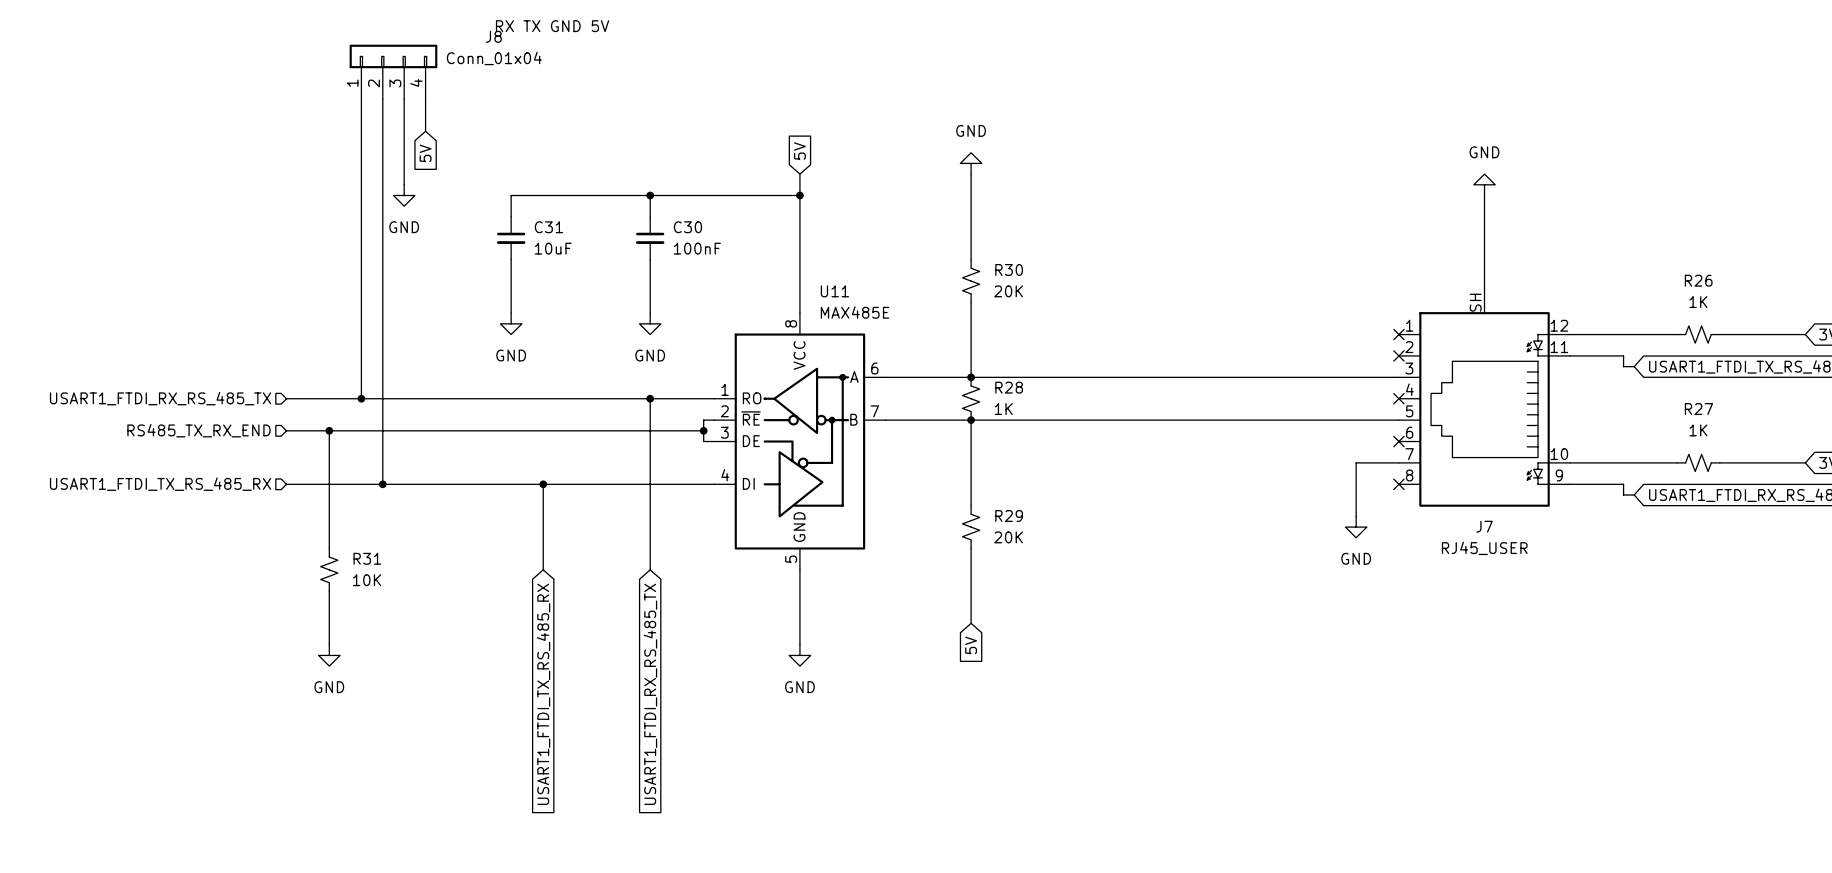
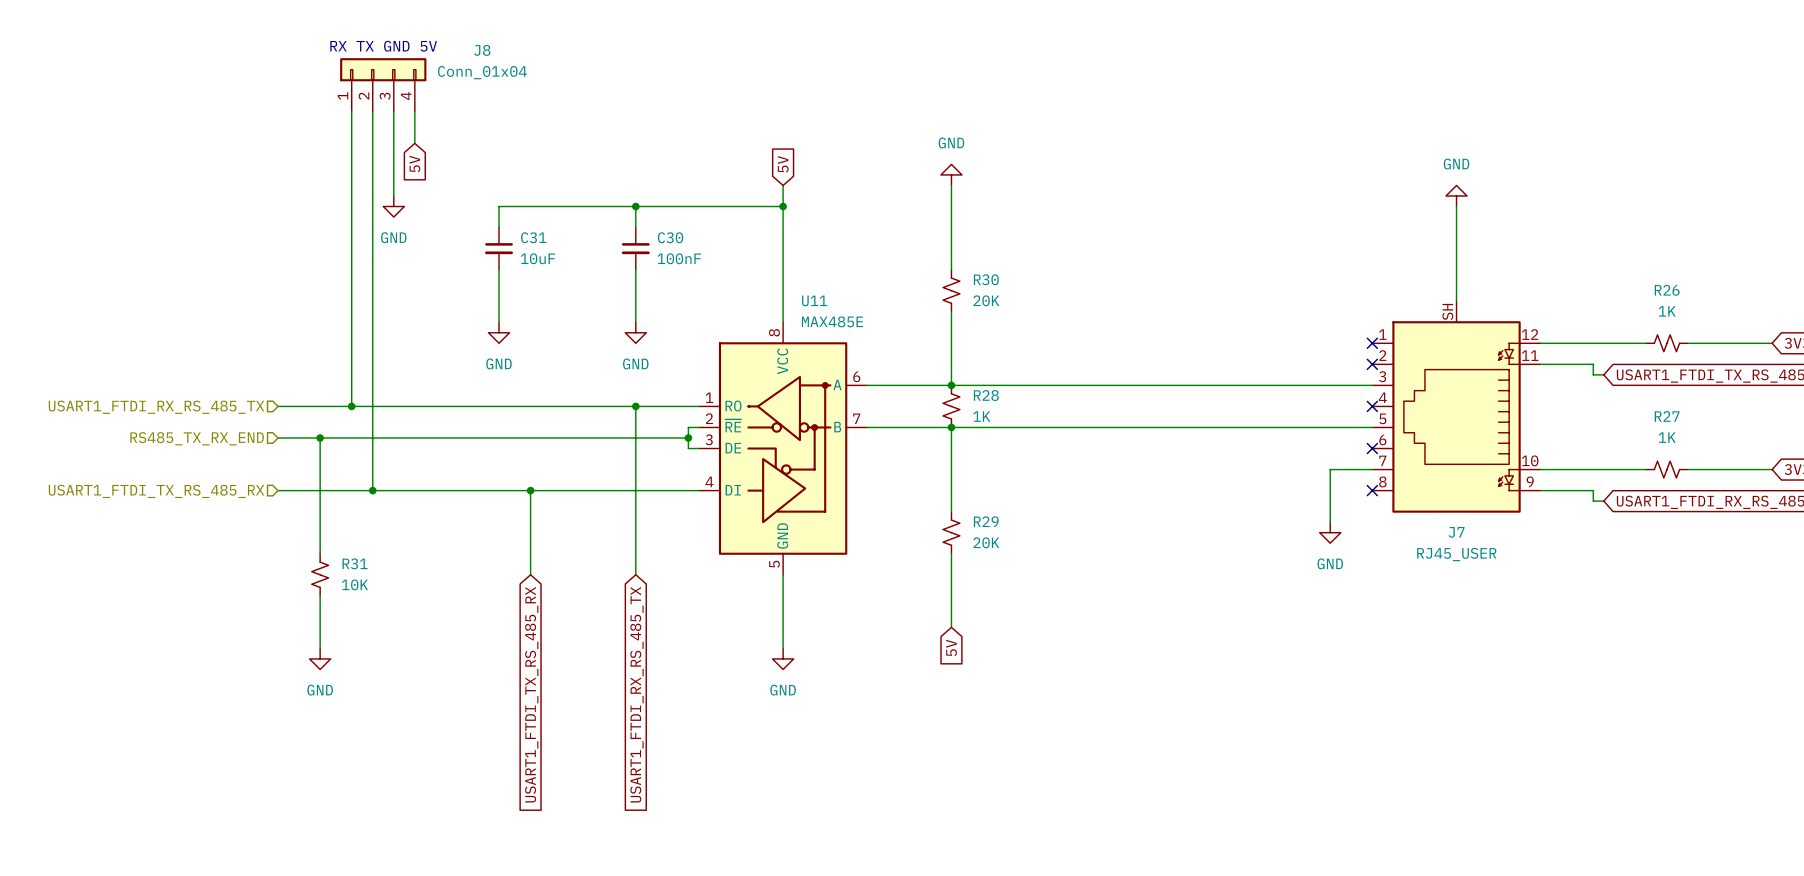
text position: RX TX GND 5V (552, 26) -> RX TX GND 5V (383, 46)

